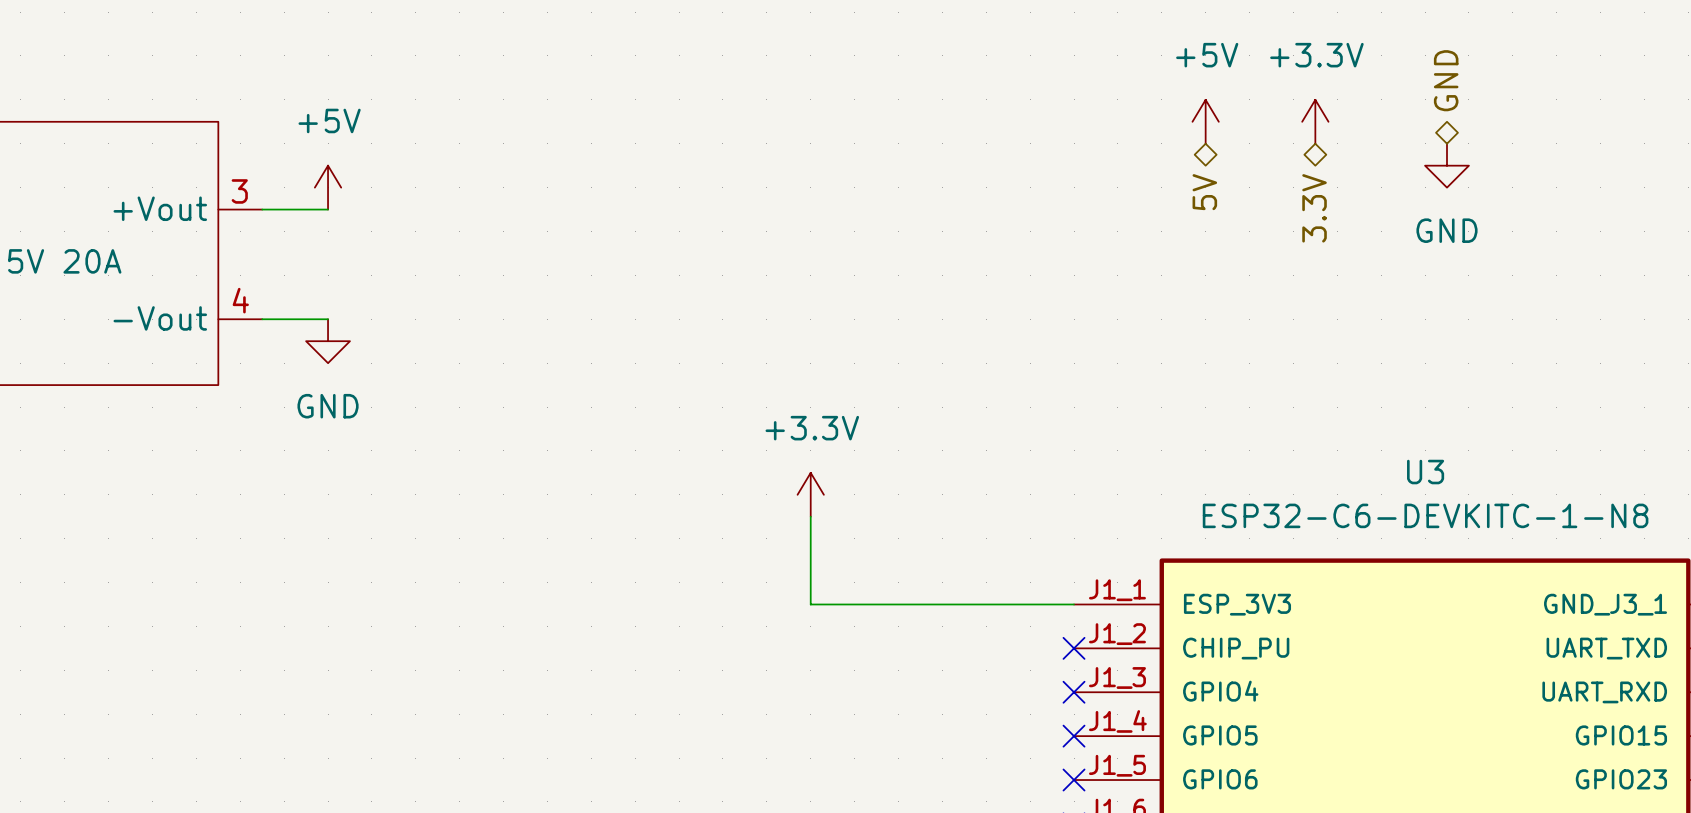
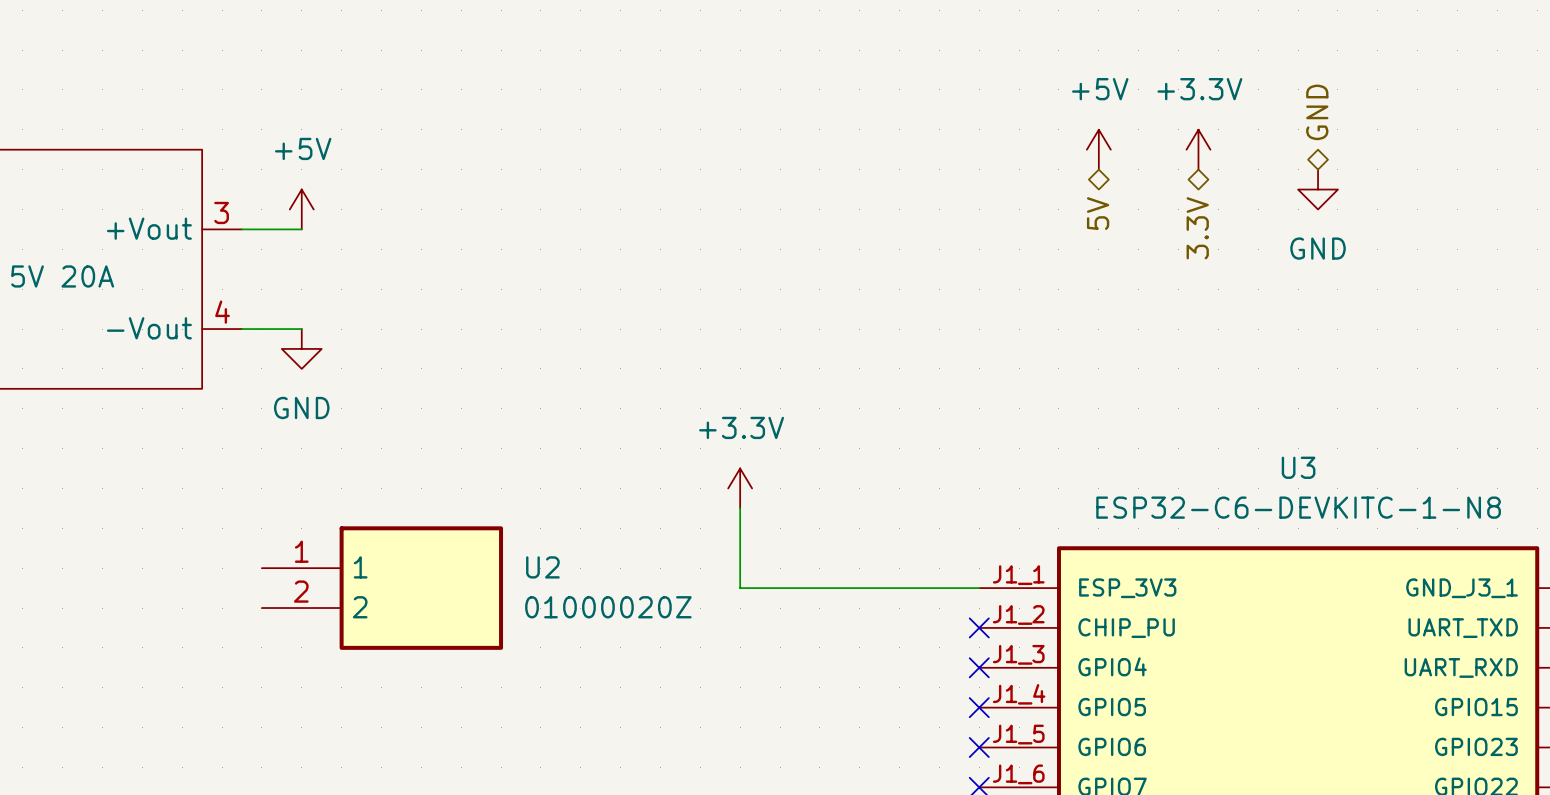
U2: none -> 01000020Z (382, 588)

